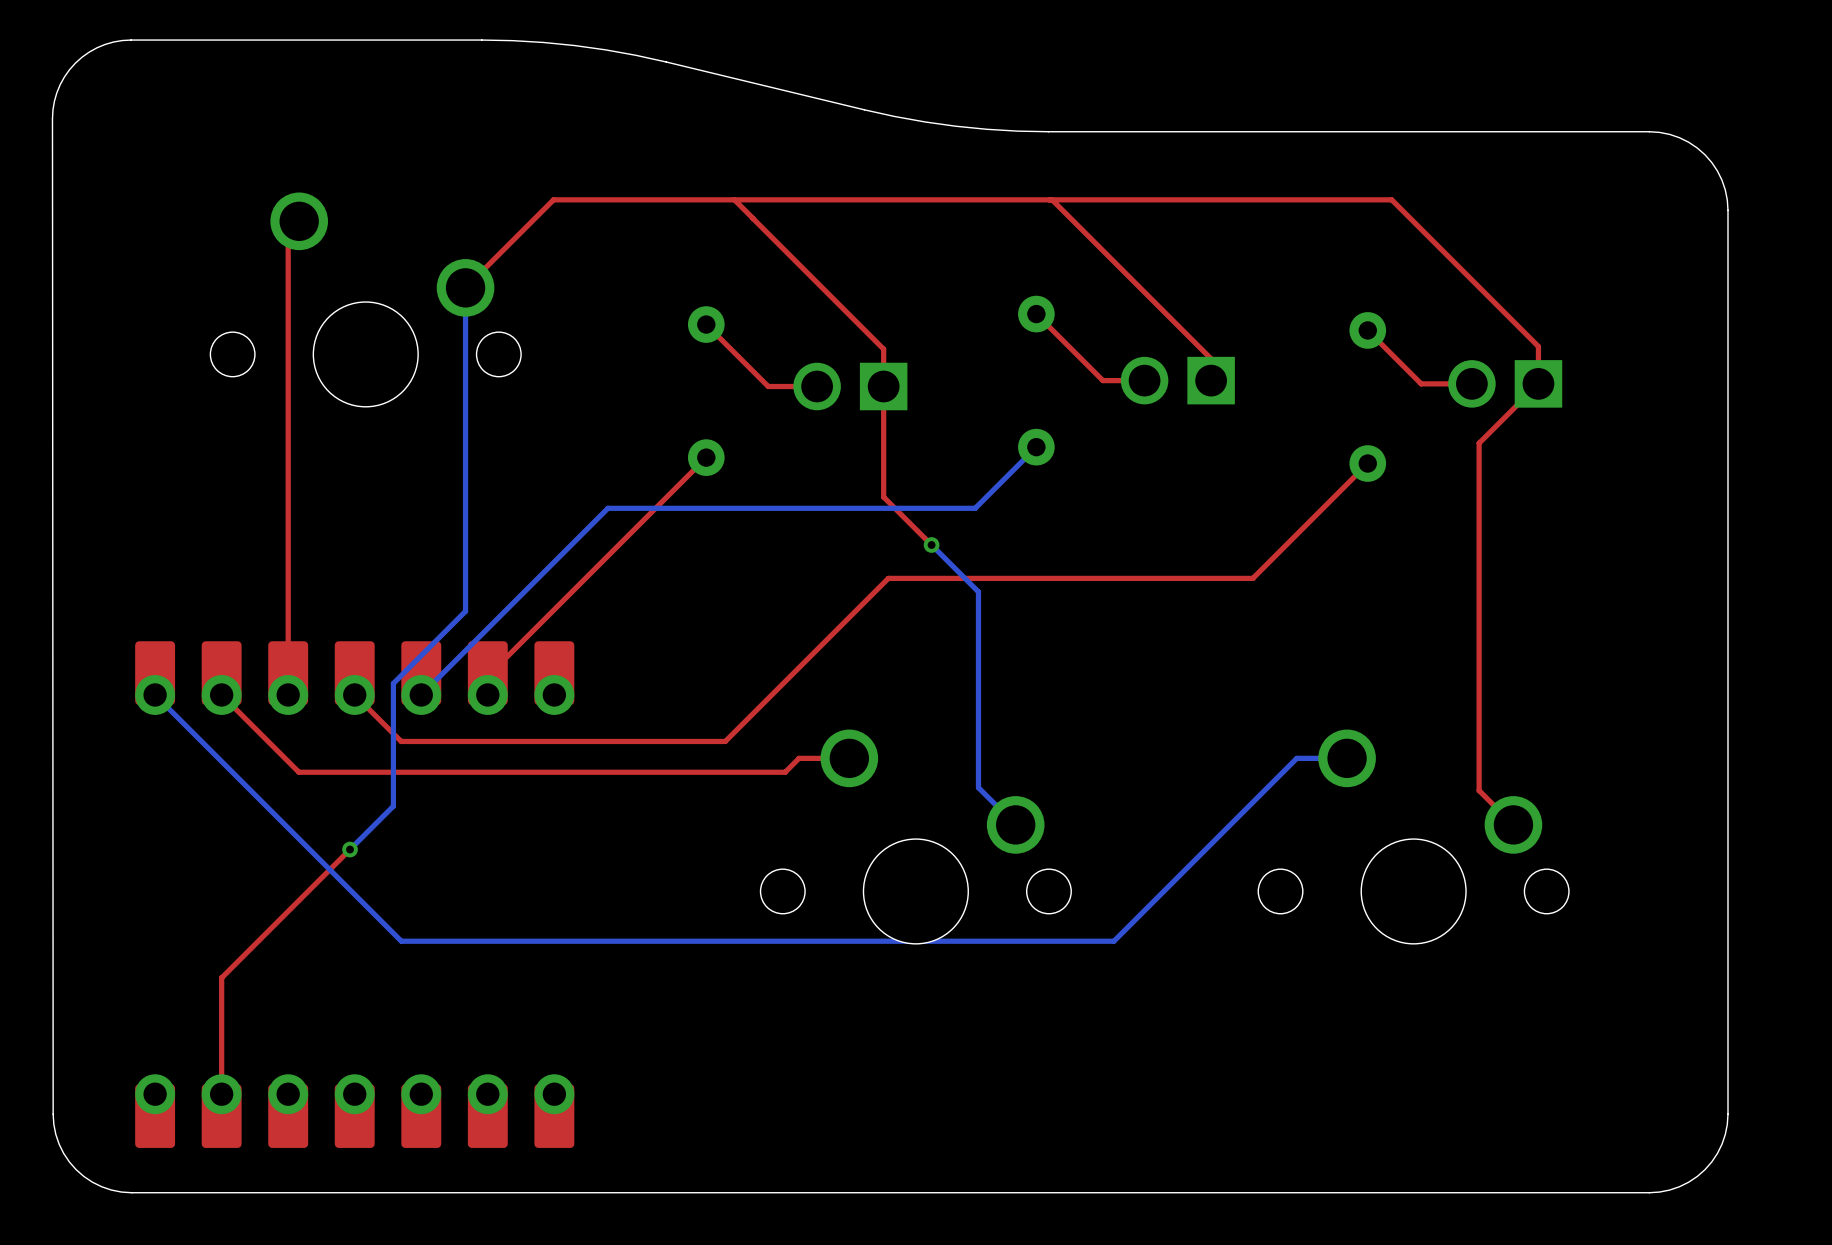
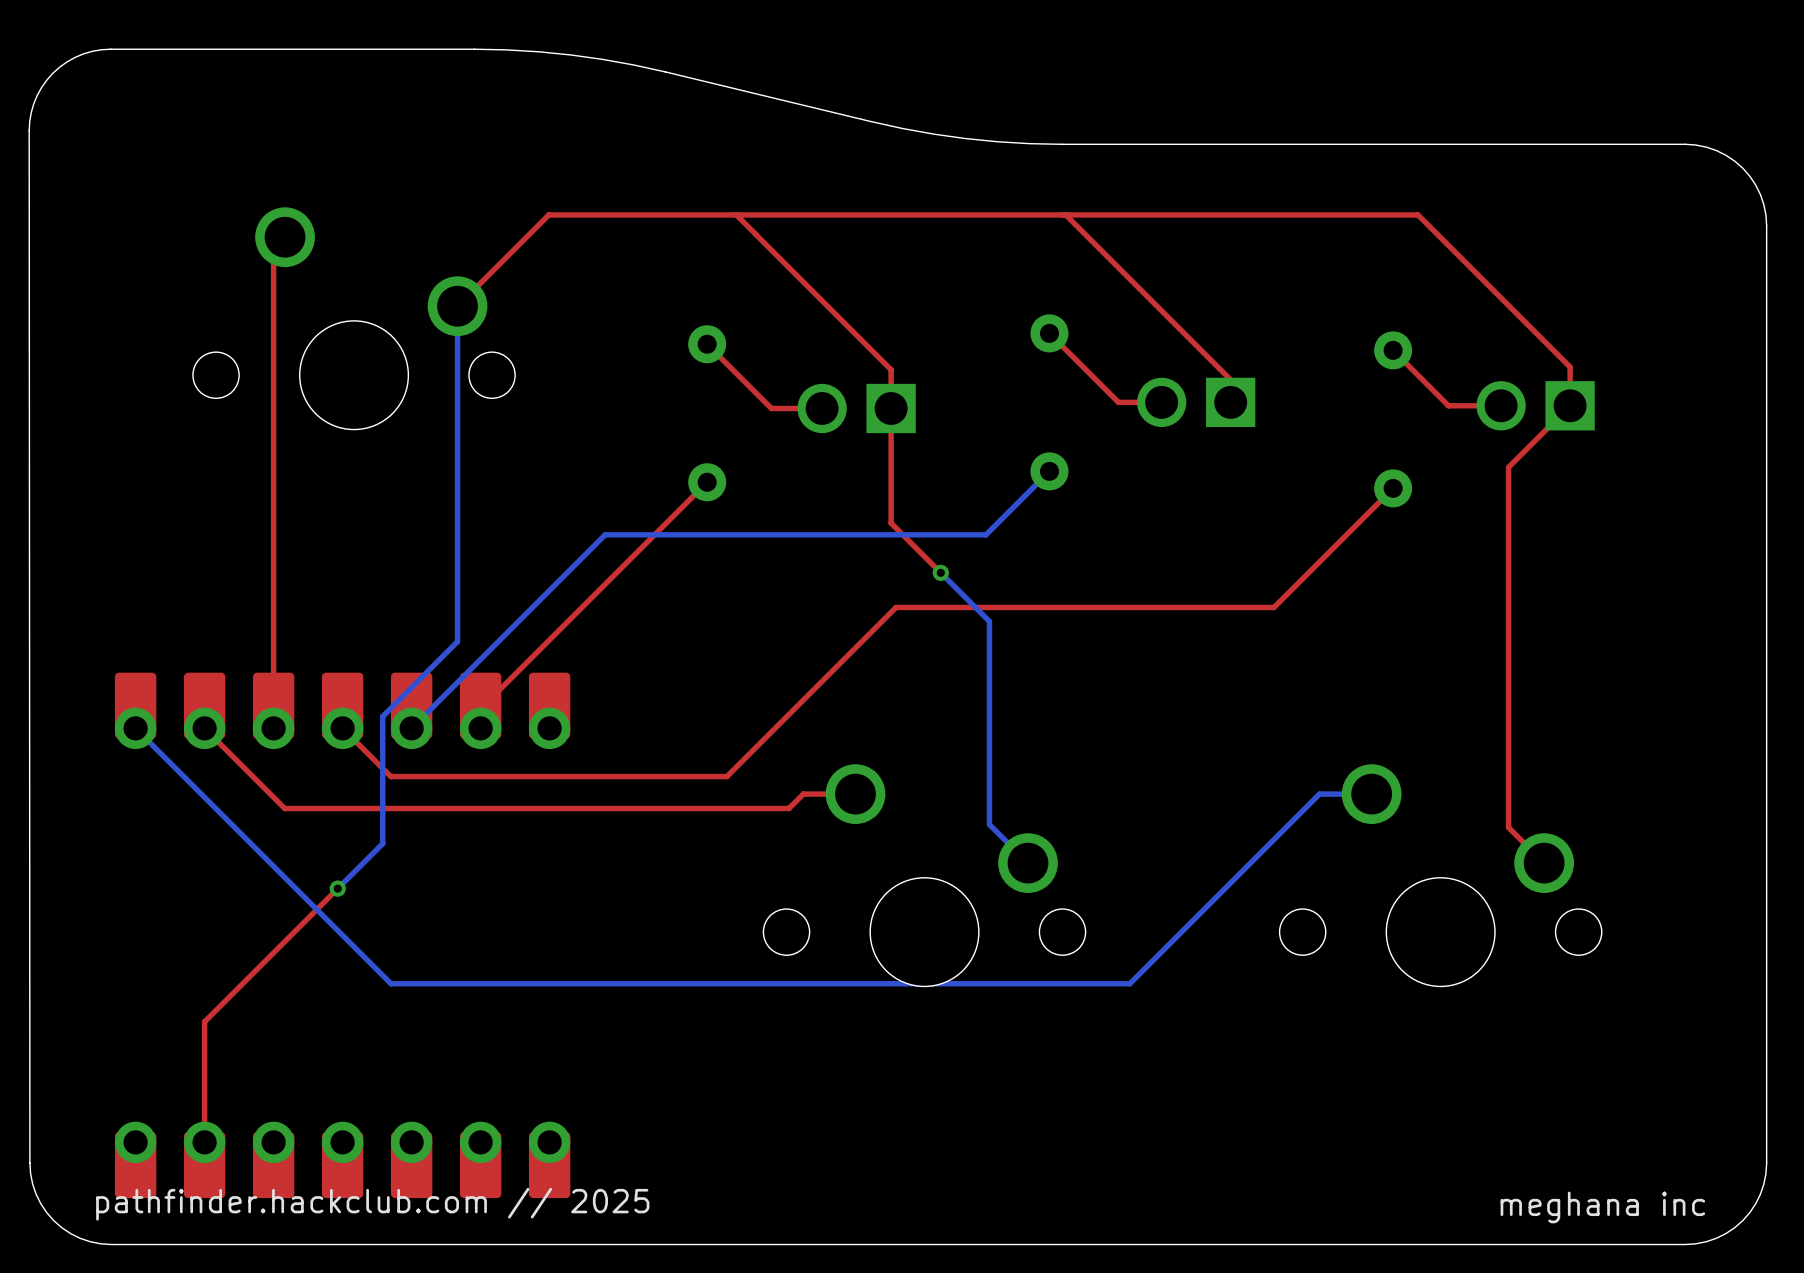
text: none -> pathfinder.hackclub.com // 2025 (372, 1204)
text: none -> meghana inc (1602, 1207)

